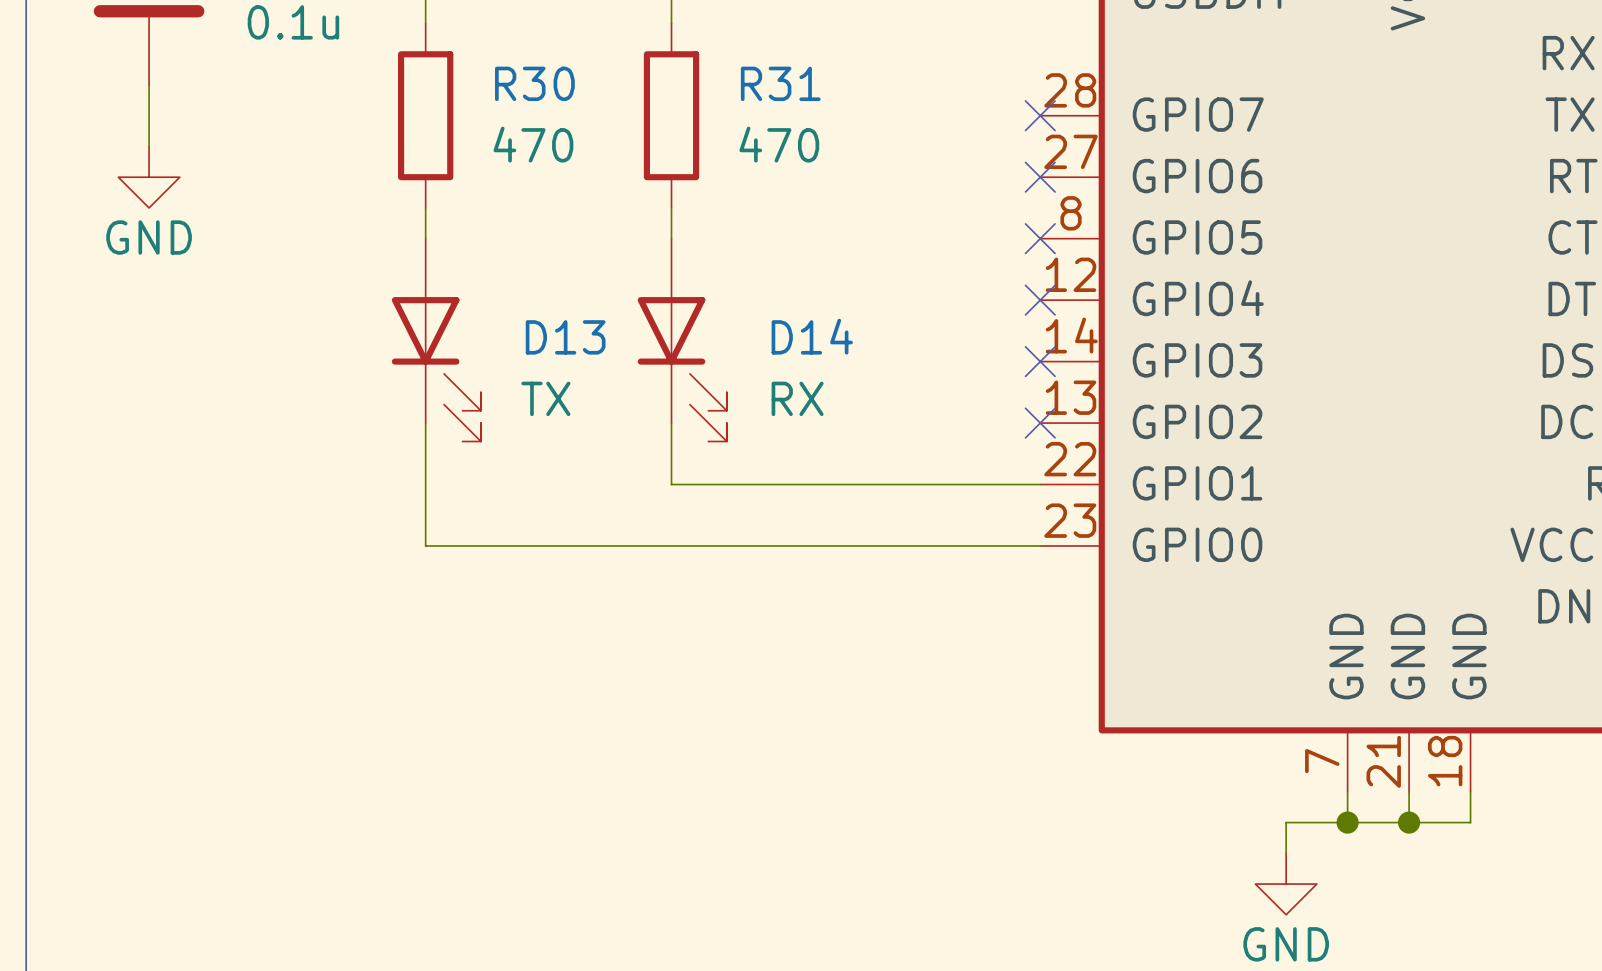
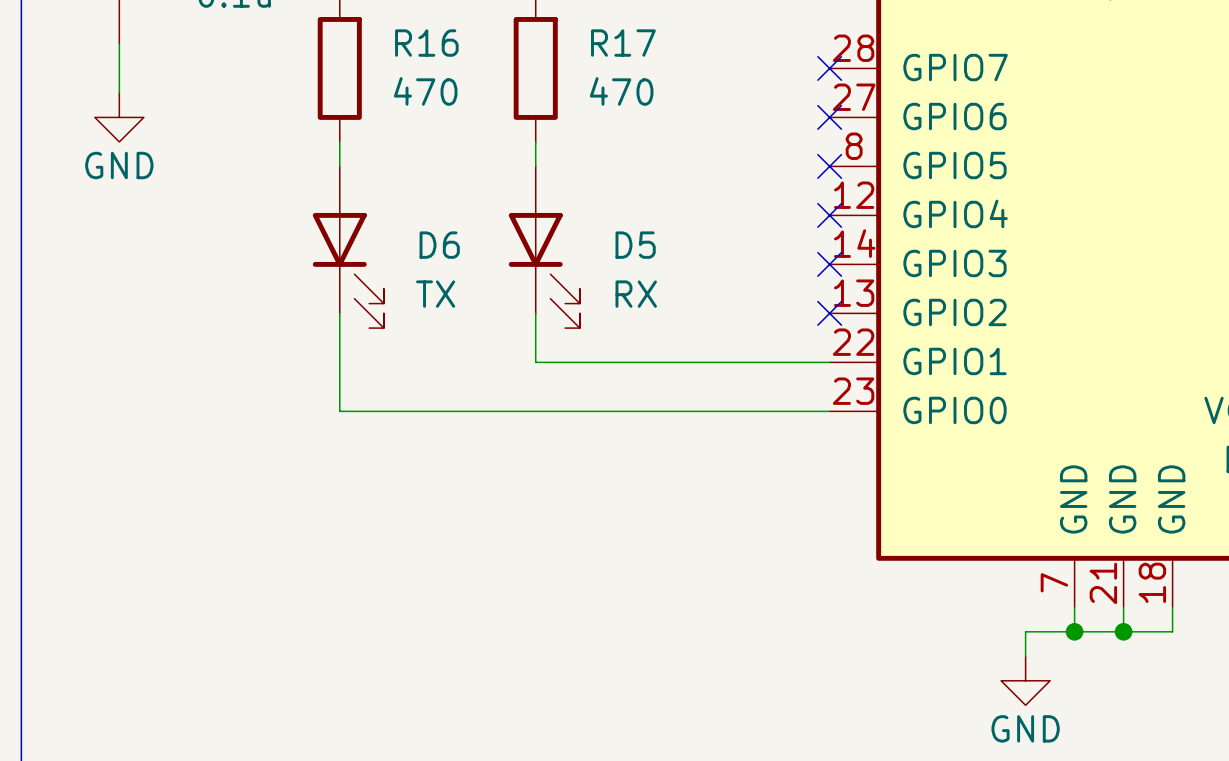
R30 name: R30 (534, 83) -> R16 (426, 43)
R31 name: R31 (780, 83) -> R17 (623, 43)
D14 name: D14 (812, 336) -> D5 (635, 245)
D13 name: D13 (565, 337) -> D6 (439, 245)

